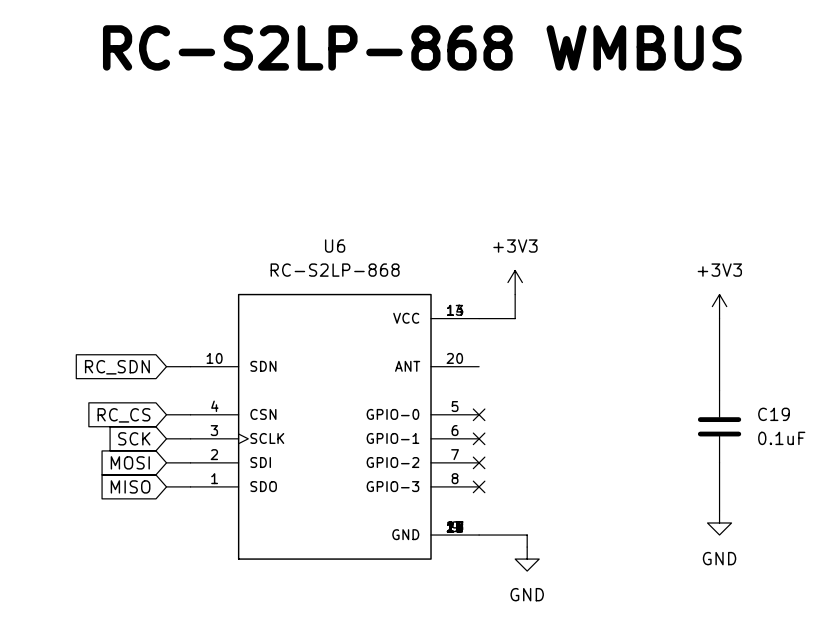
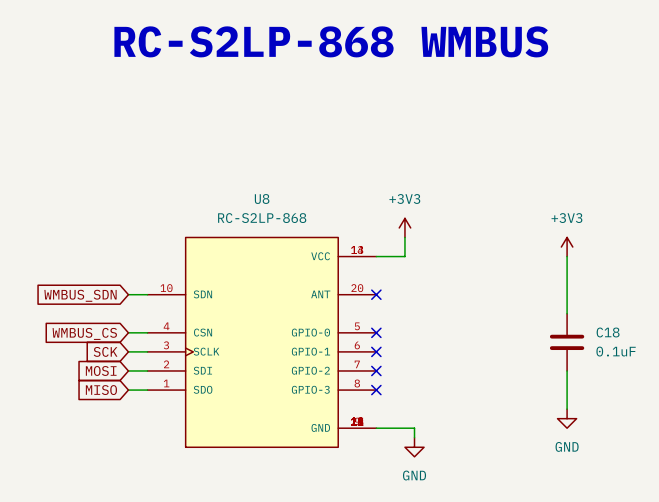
U6 name: U6 (335, 246) -> U8 (262, 198)
no-connect mark: none -> (376, 294)
global label: RC_SDN (117, 367) -> WMBUS_SDN (80, 295)
C19 name: C19 (774, 414) -> C18 (608, 332)
global label: RC_CS (123, 415) -> WMBUS_CS (84, 333)

